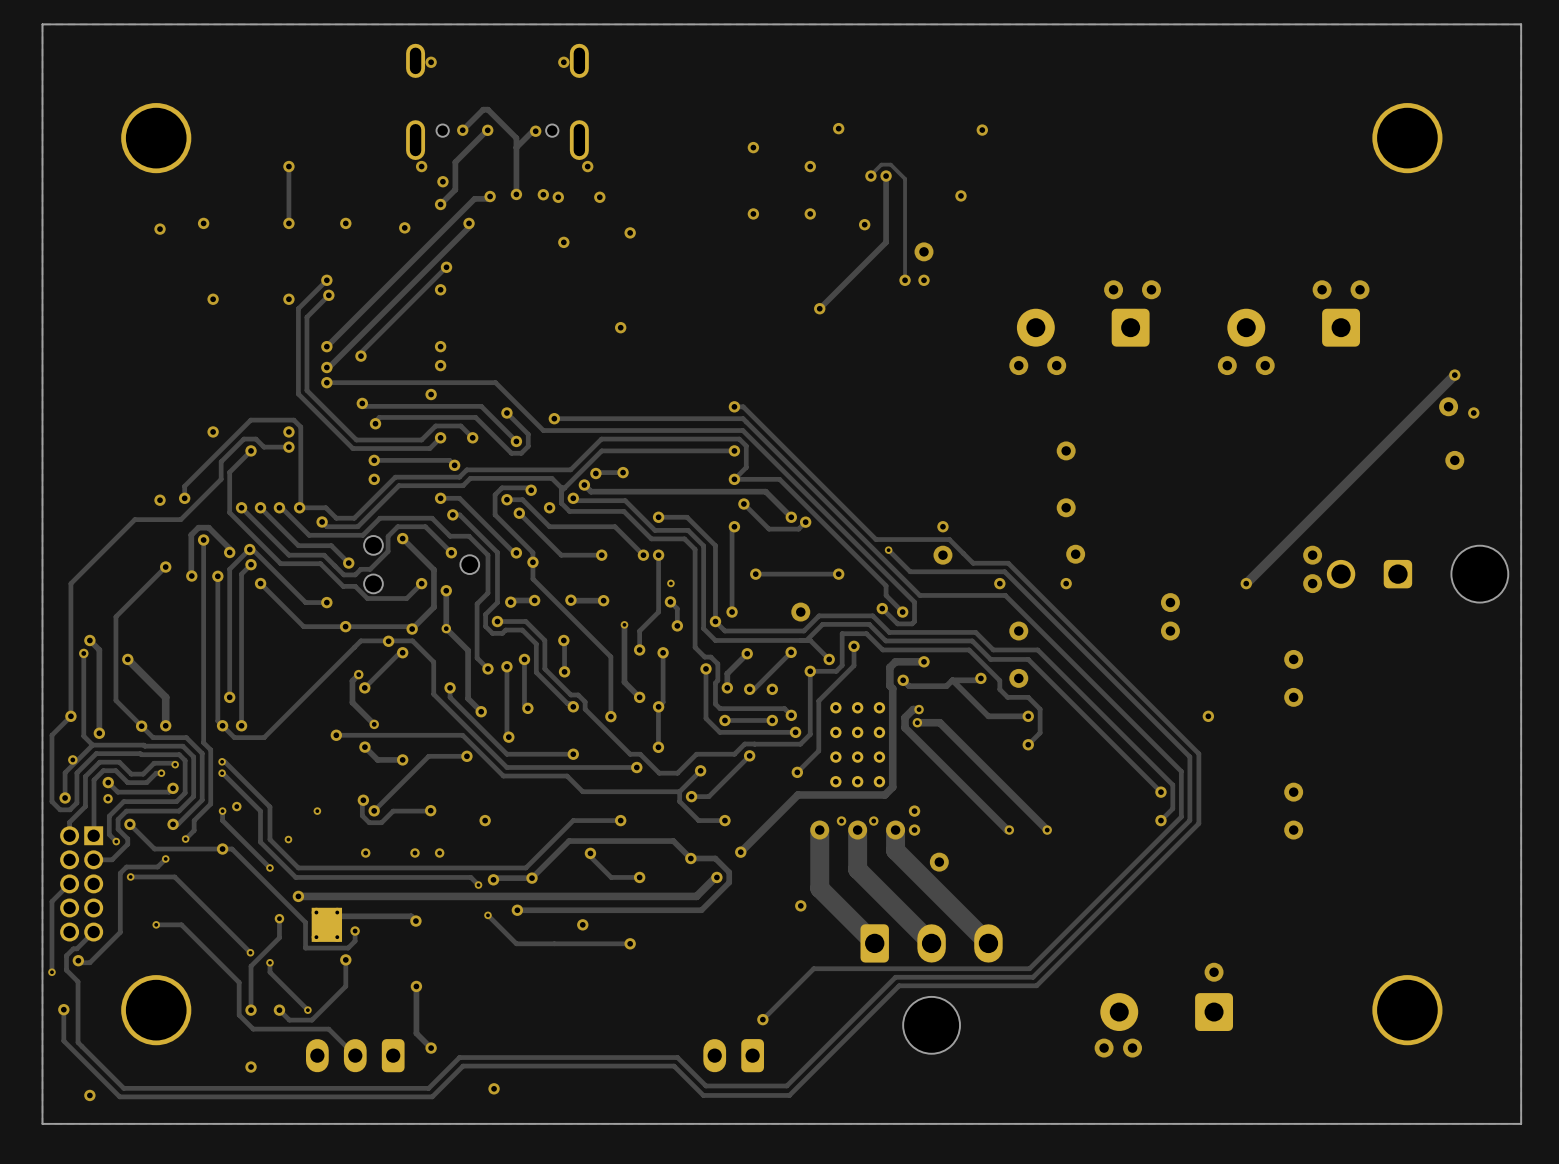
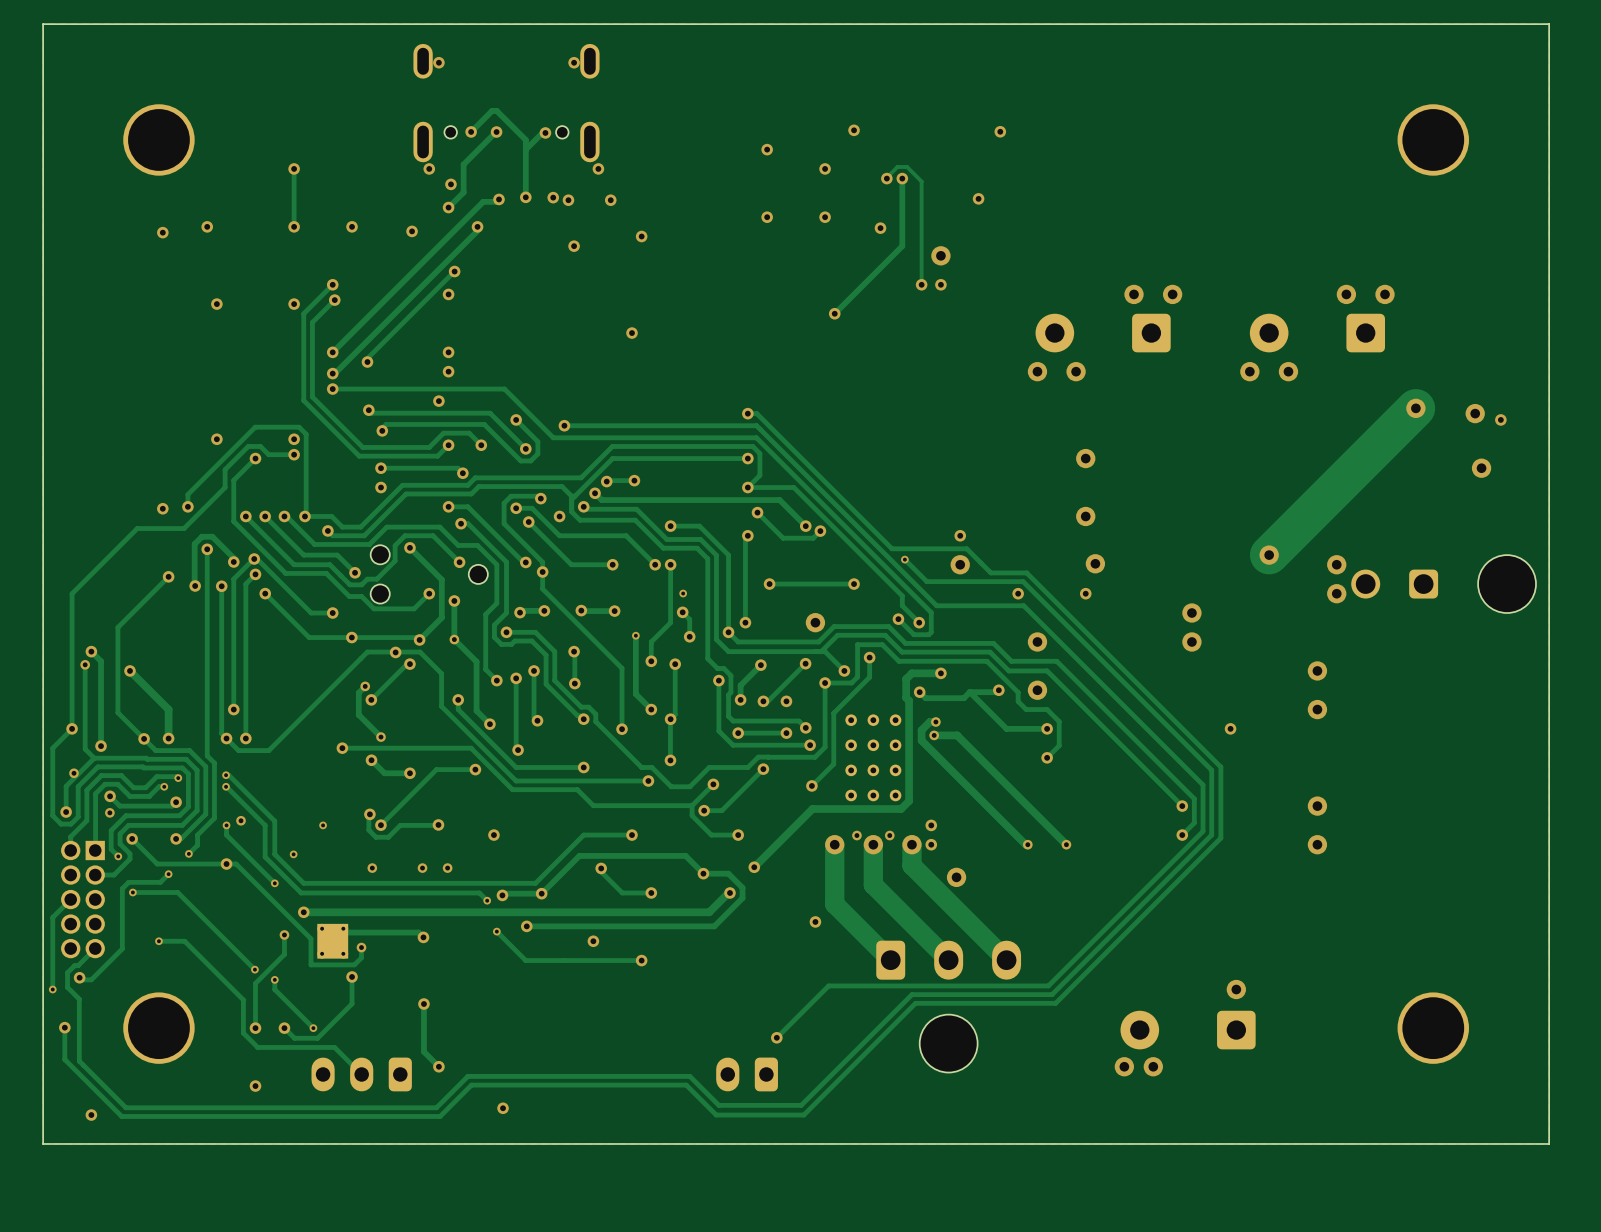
track: (1454, 375) (1246, 583) -> none
via: (1454, 375) -> none
track: none -> (1415, 408) (1269, 555)
via: none -> (1415, 408)
via: none -> (1269, 555)
via: (1246, 583) -> none

